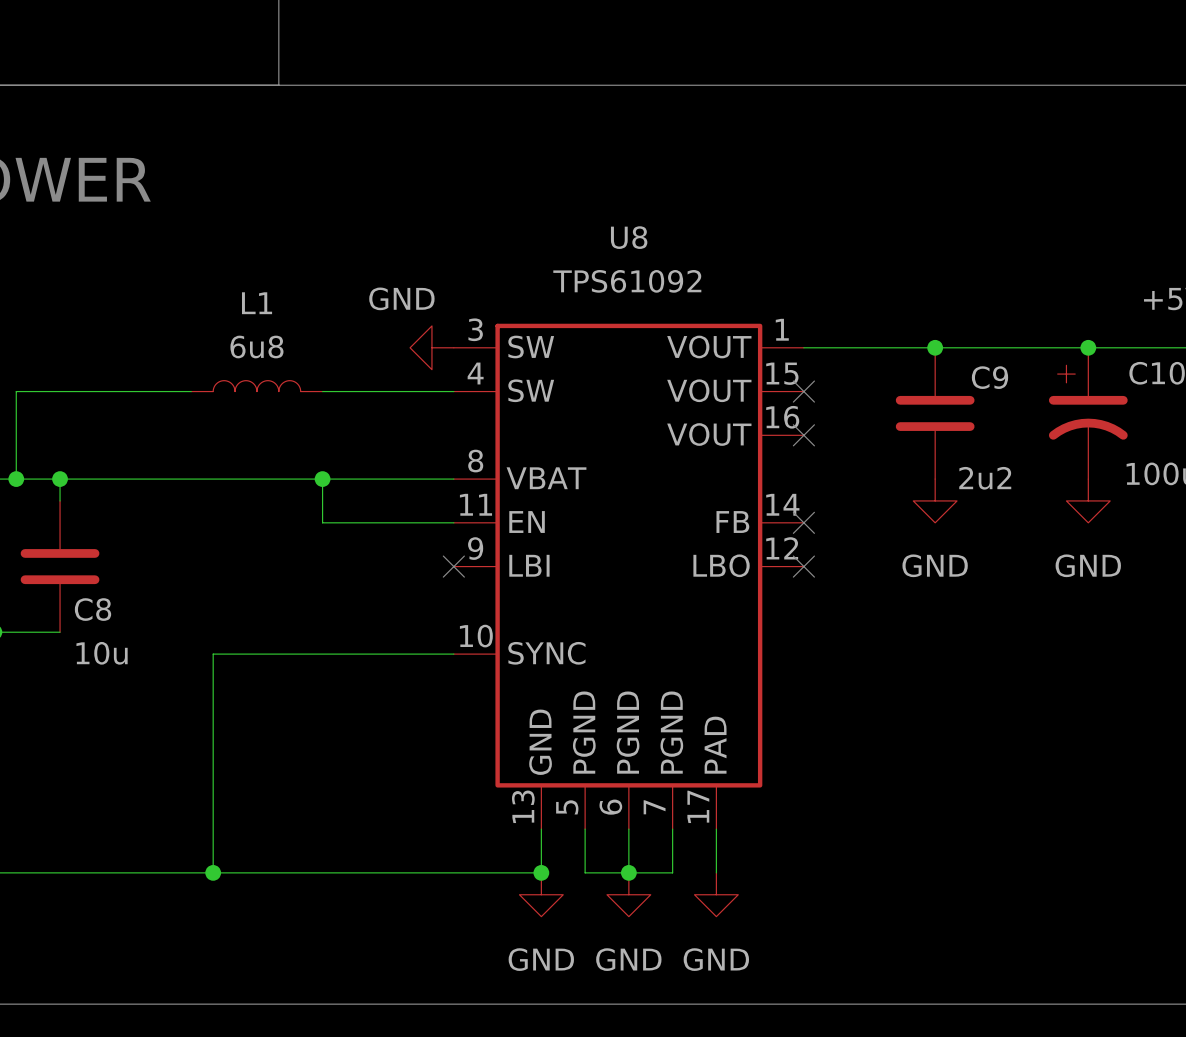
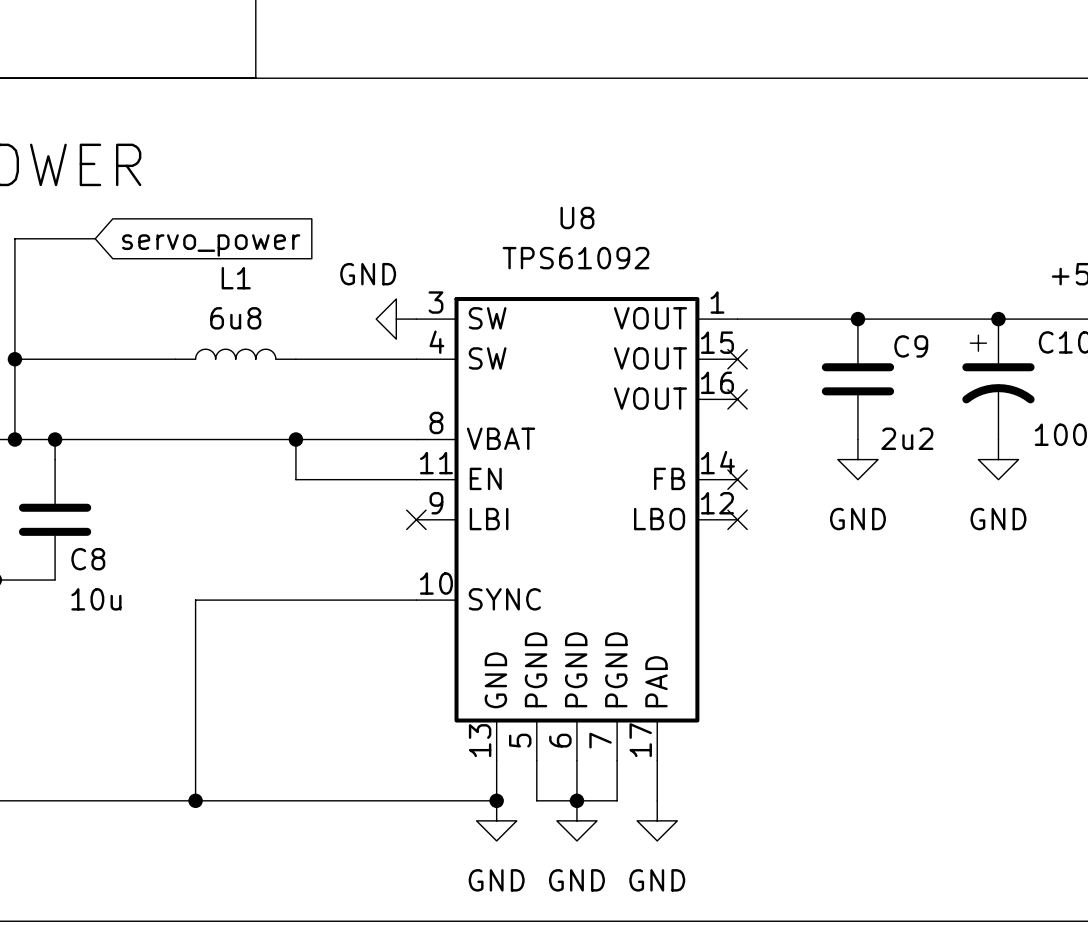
wire: none -> (95, 238) (14, 238) (14, 359)
global label: none -> servo_power (211, 245)
junction: none -> (14, 359)

